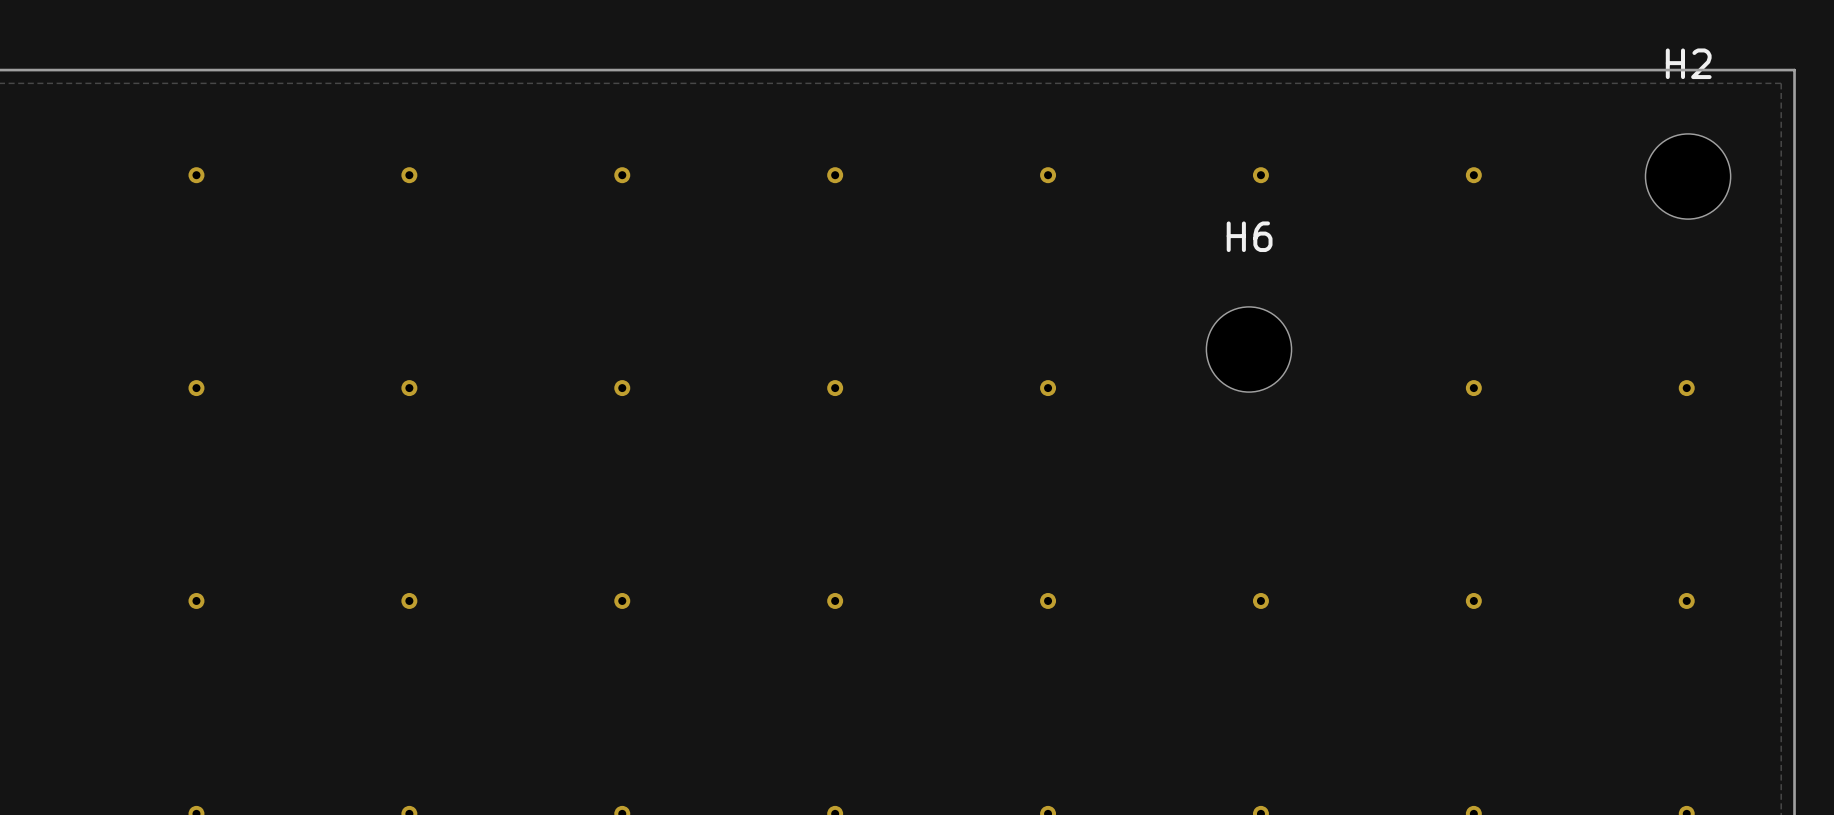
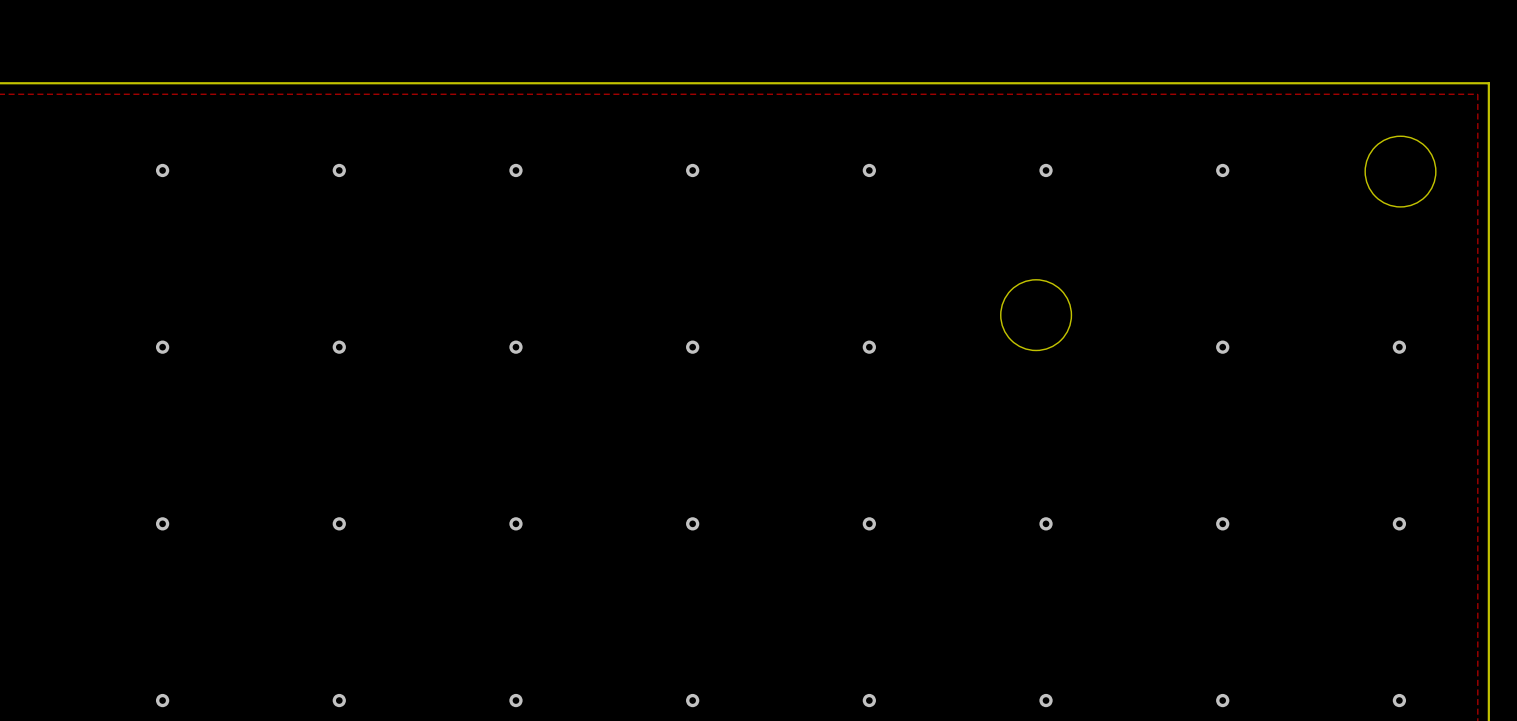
H2 name: H2 (1688, 63) -> none
H6 name: H6 (1249, 236) -> none

